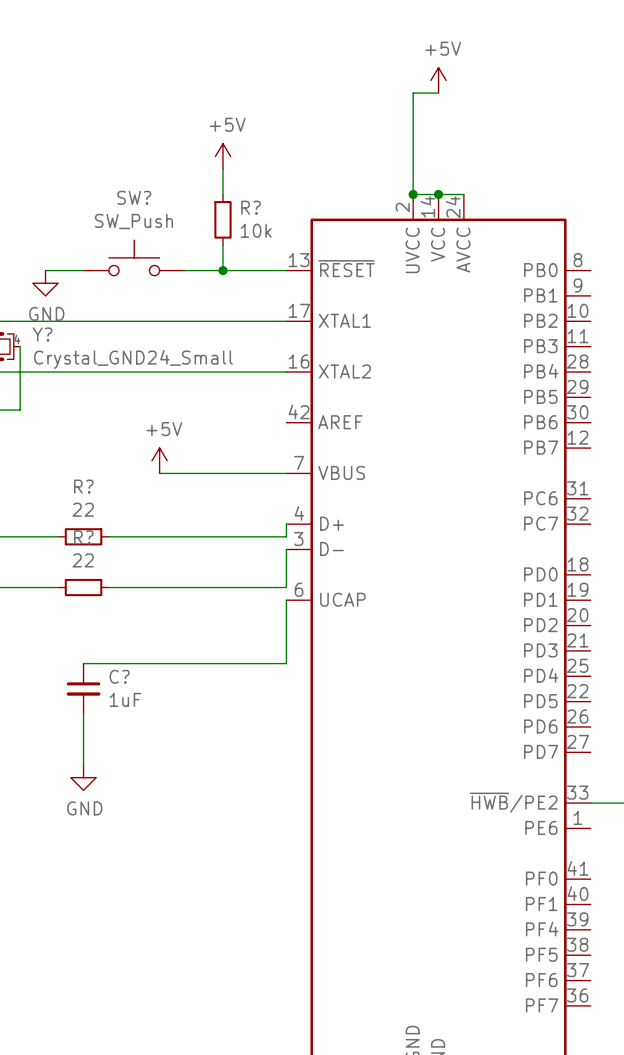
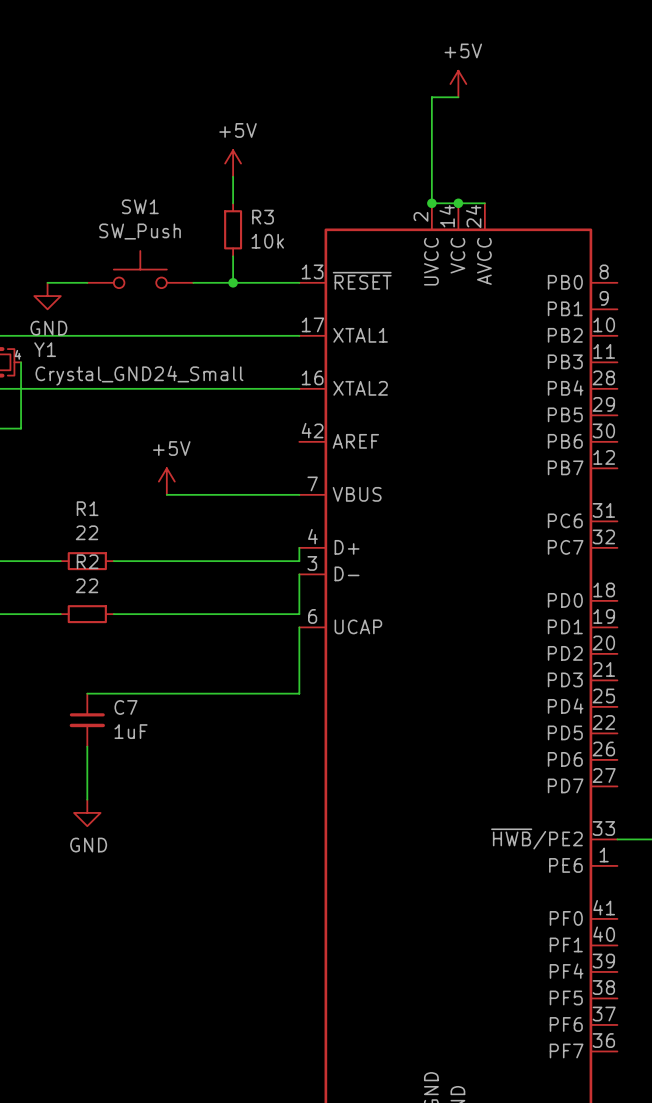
SW? name: SW? (134, 197) -> SW1 (140, 206)
R? name: R? (251, 207) -> R3 (263, 217)
Y? name: Y? (42, 334) -> Y1 (45, 349)
R? name: R? (83, 486) -> R1 (87, 508)
R? name: R? (83, 537) -> R2 (87, 561)
C? name: C? (119, 676) -> C7 (125, 707)

